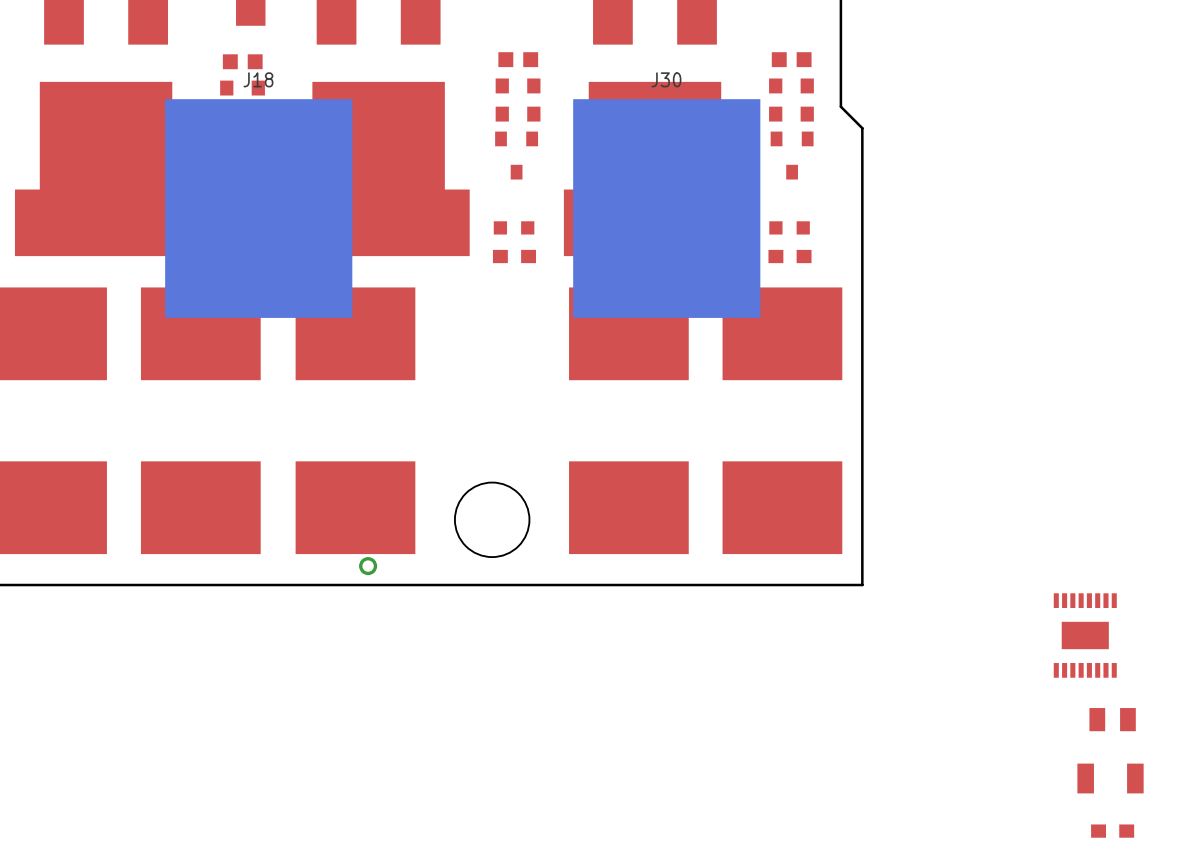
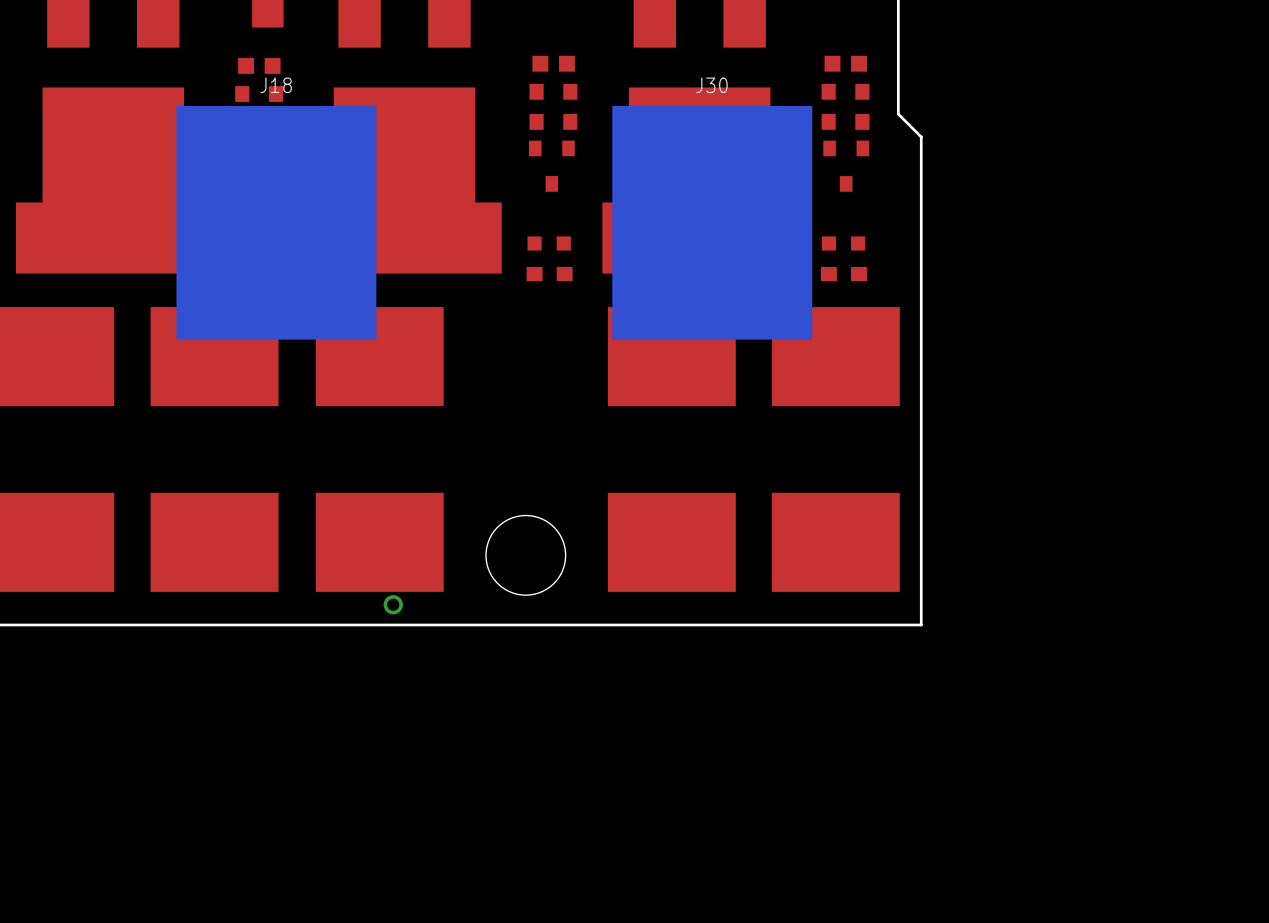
part: (1085, 635) -> none
part: (1112, 719) -> none
part: (1110, 778) -> none
part: (1112, 831) -> none

